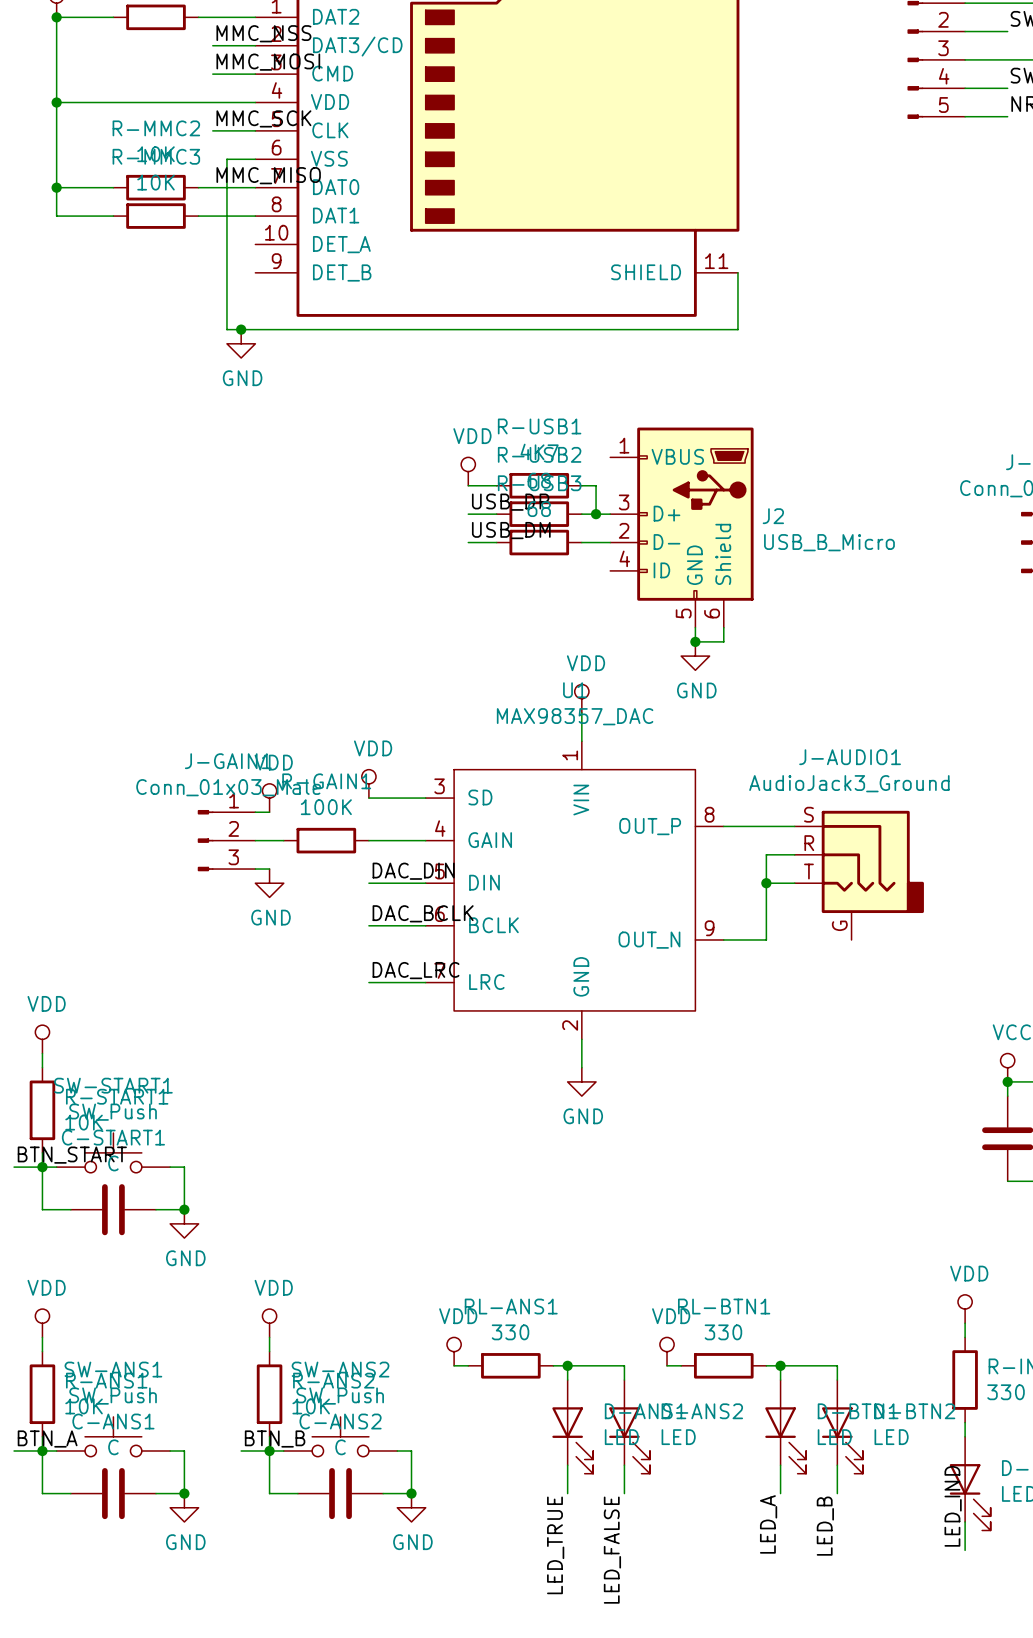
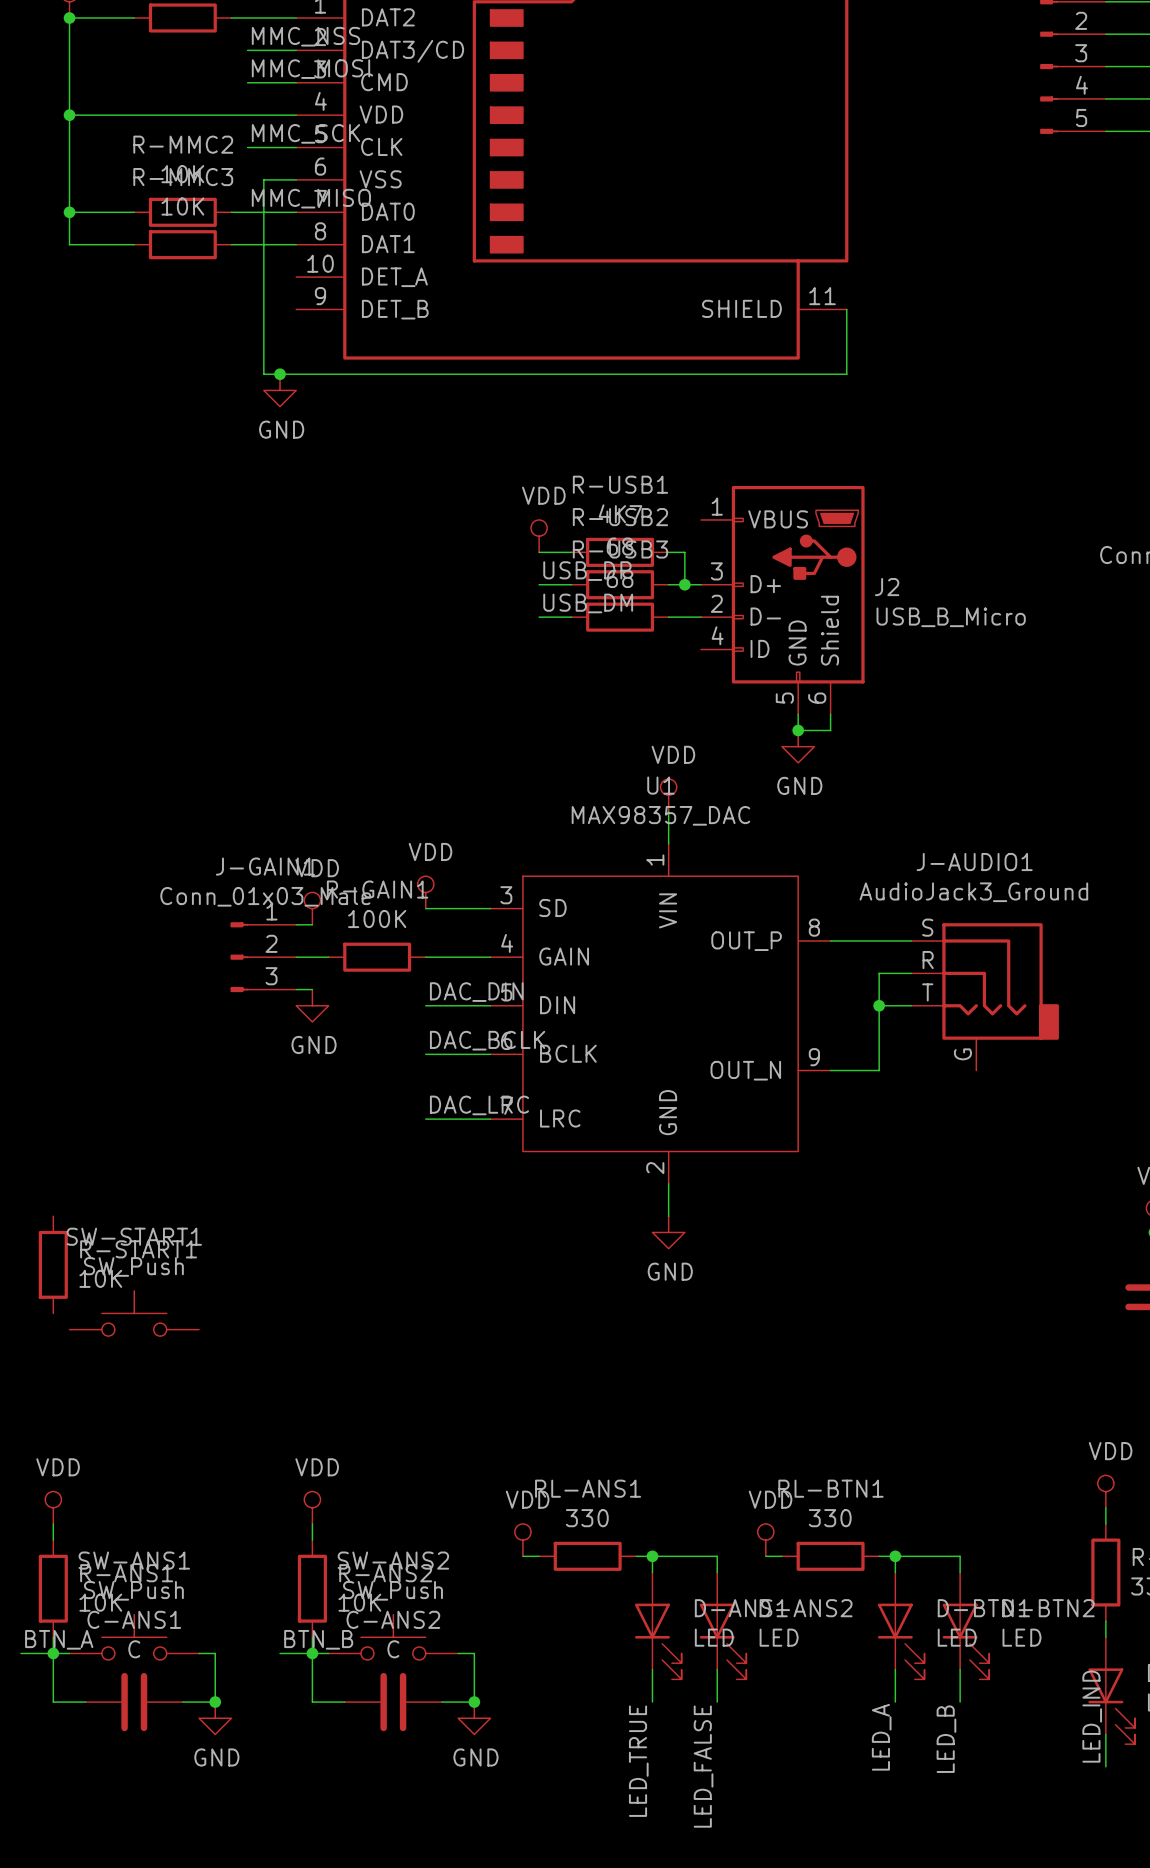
power symbol: VDD (42, 1039) -> none
wire: (42, 1053) (42, 1067) -> none
wire: (42, 1152) (42, 1209) (70, 1209) -> none
label: BTN_START (72, 1155) -> none
wire: (14, 1167) (56, 1167) -> none
junction: (42, 1167) -> none
wire: (170, 1167) (184, 1167) (184, 1209) (156, 1209) -> none
C-START1: C (113, 1209) -> none
junction: (184, 1209) -> none
power symbol: GND (184, 1223) -> none

